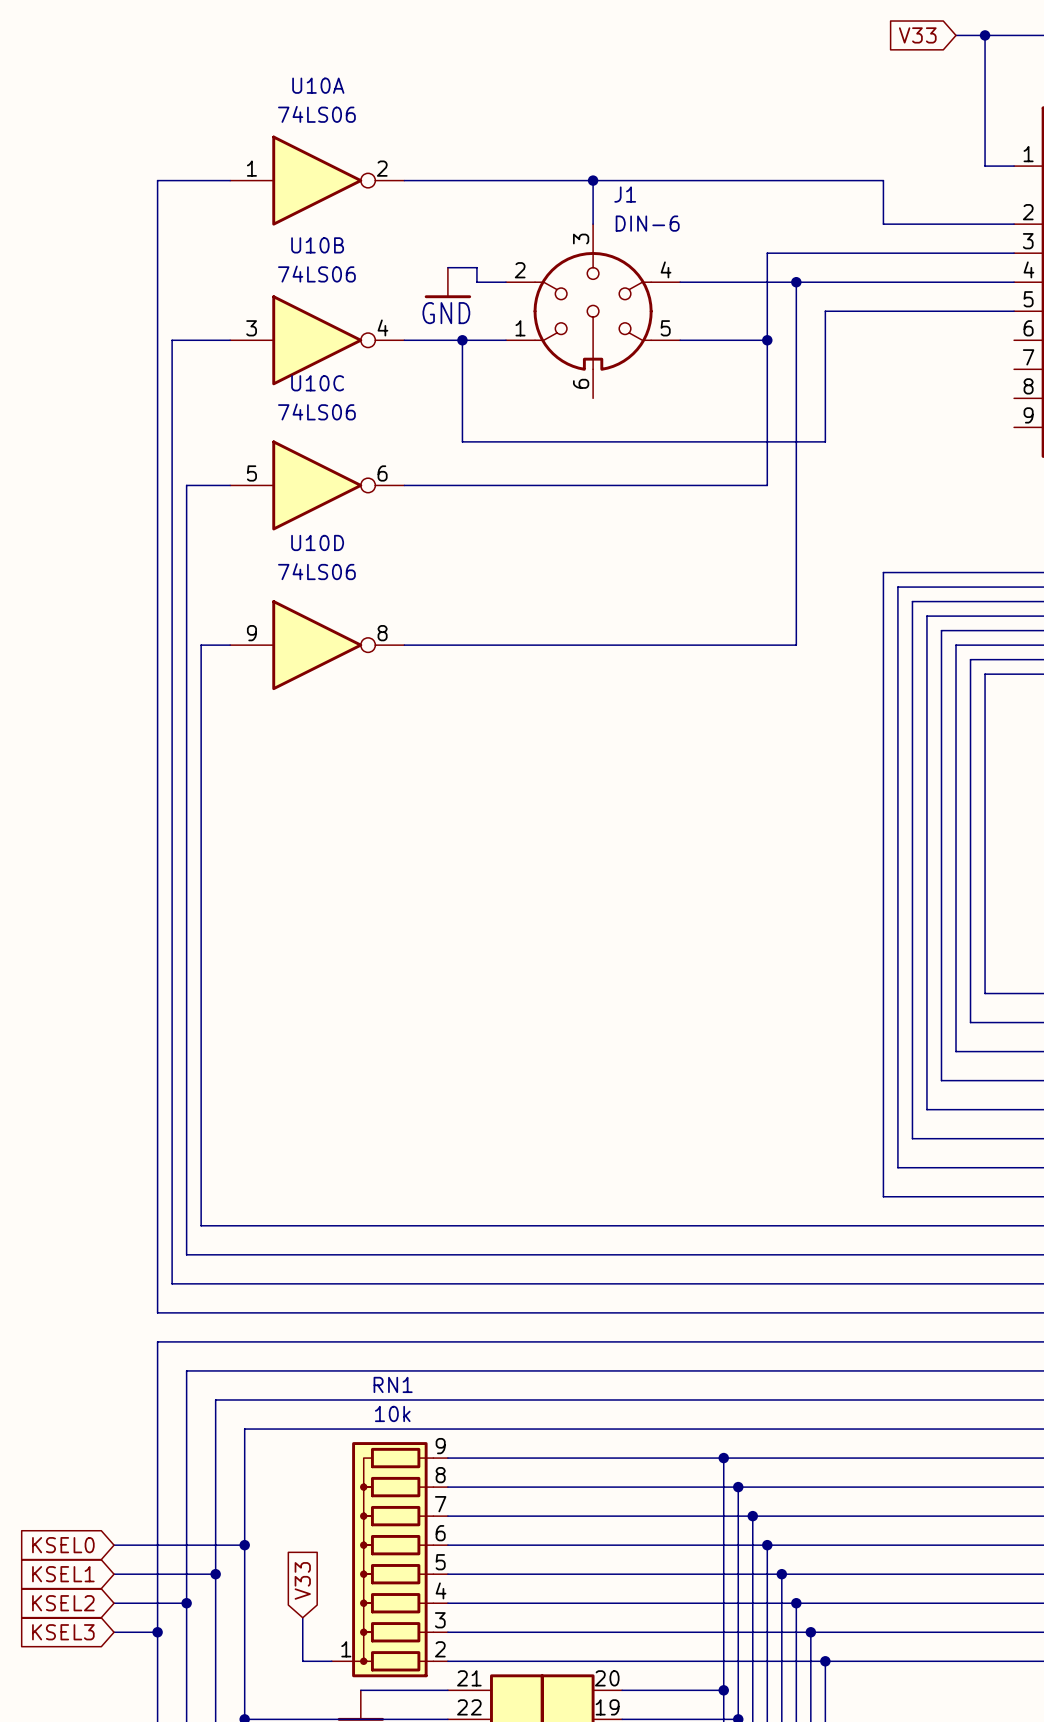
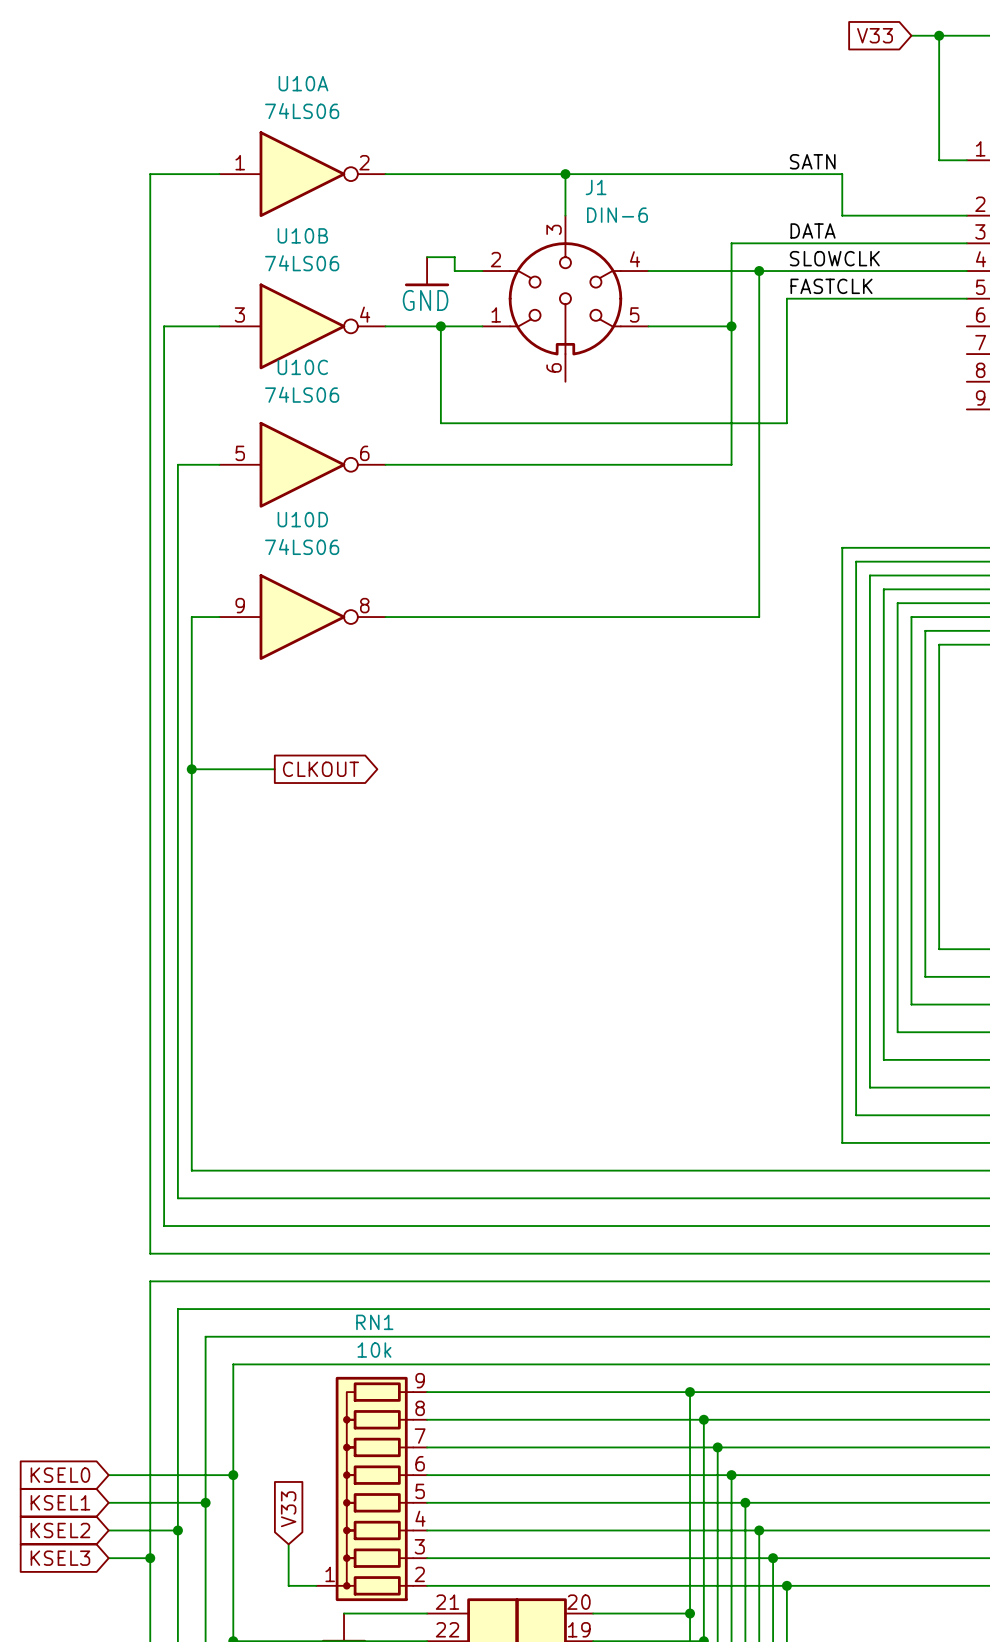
label: none -> SATN (812, 161)
label: none -> DATA (813, 230)
label: none -> SLOWCLK (834, 258)
label: none -> FASTCLK (831, 286)
wire: none -> (191, 769) (274, 769)
junction: none -> (191, 769)
global label: none -> CLKOUT (320, 769)

